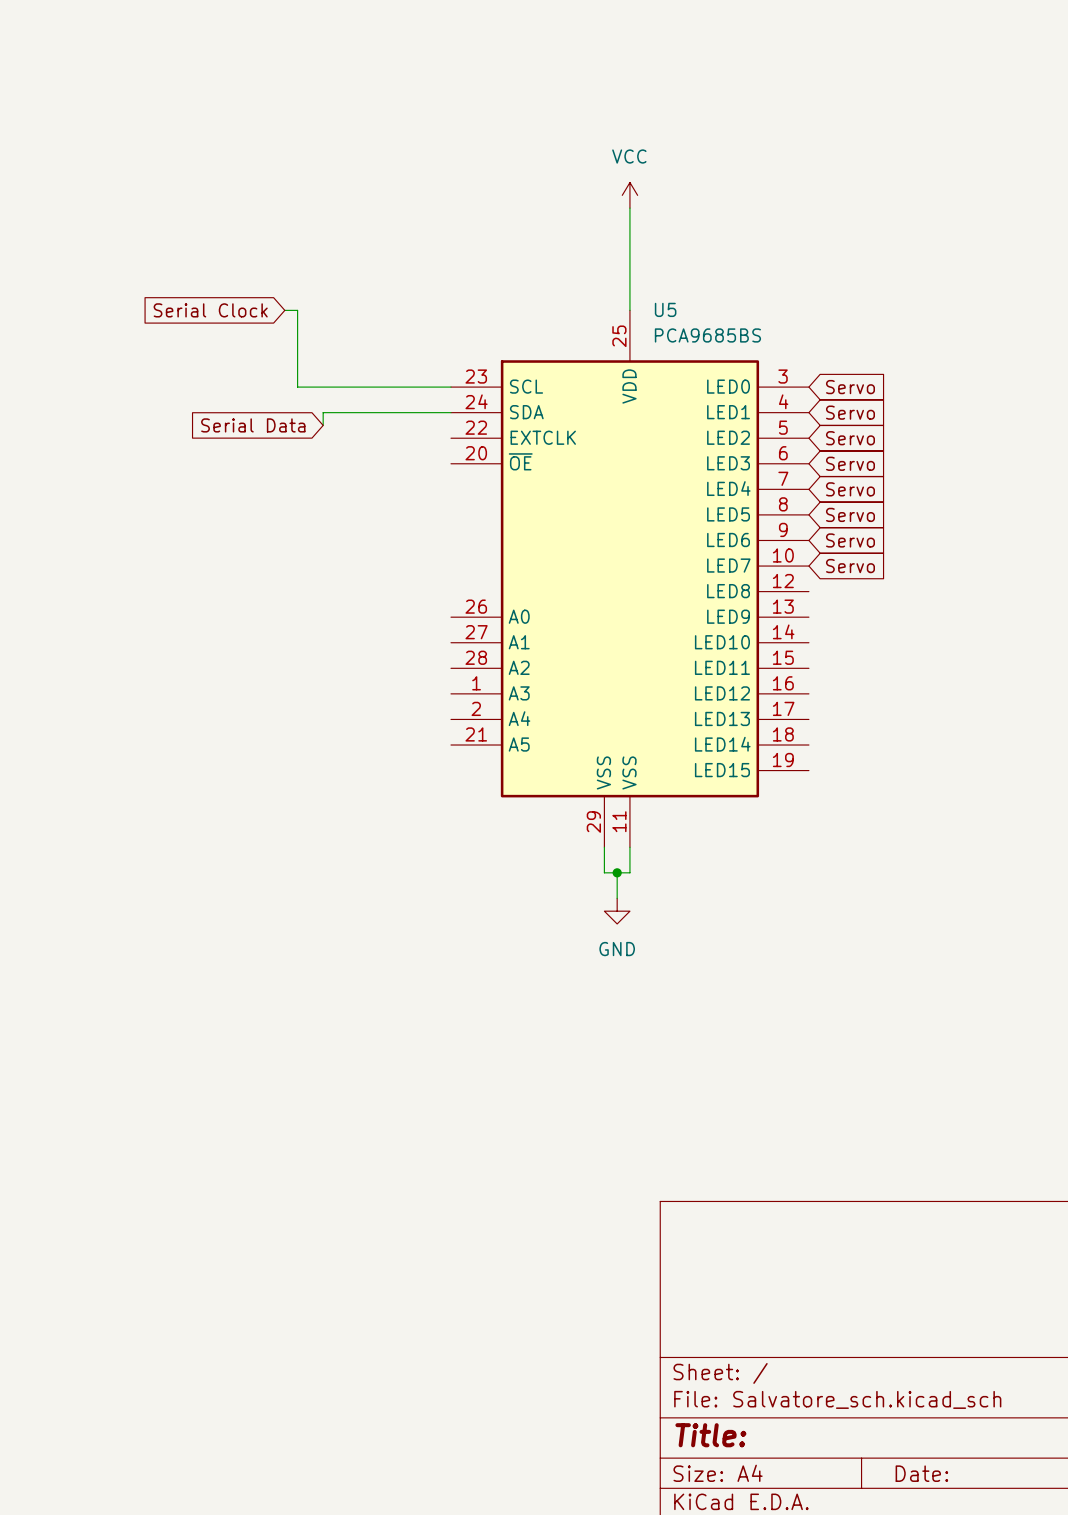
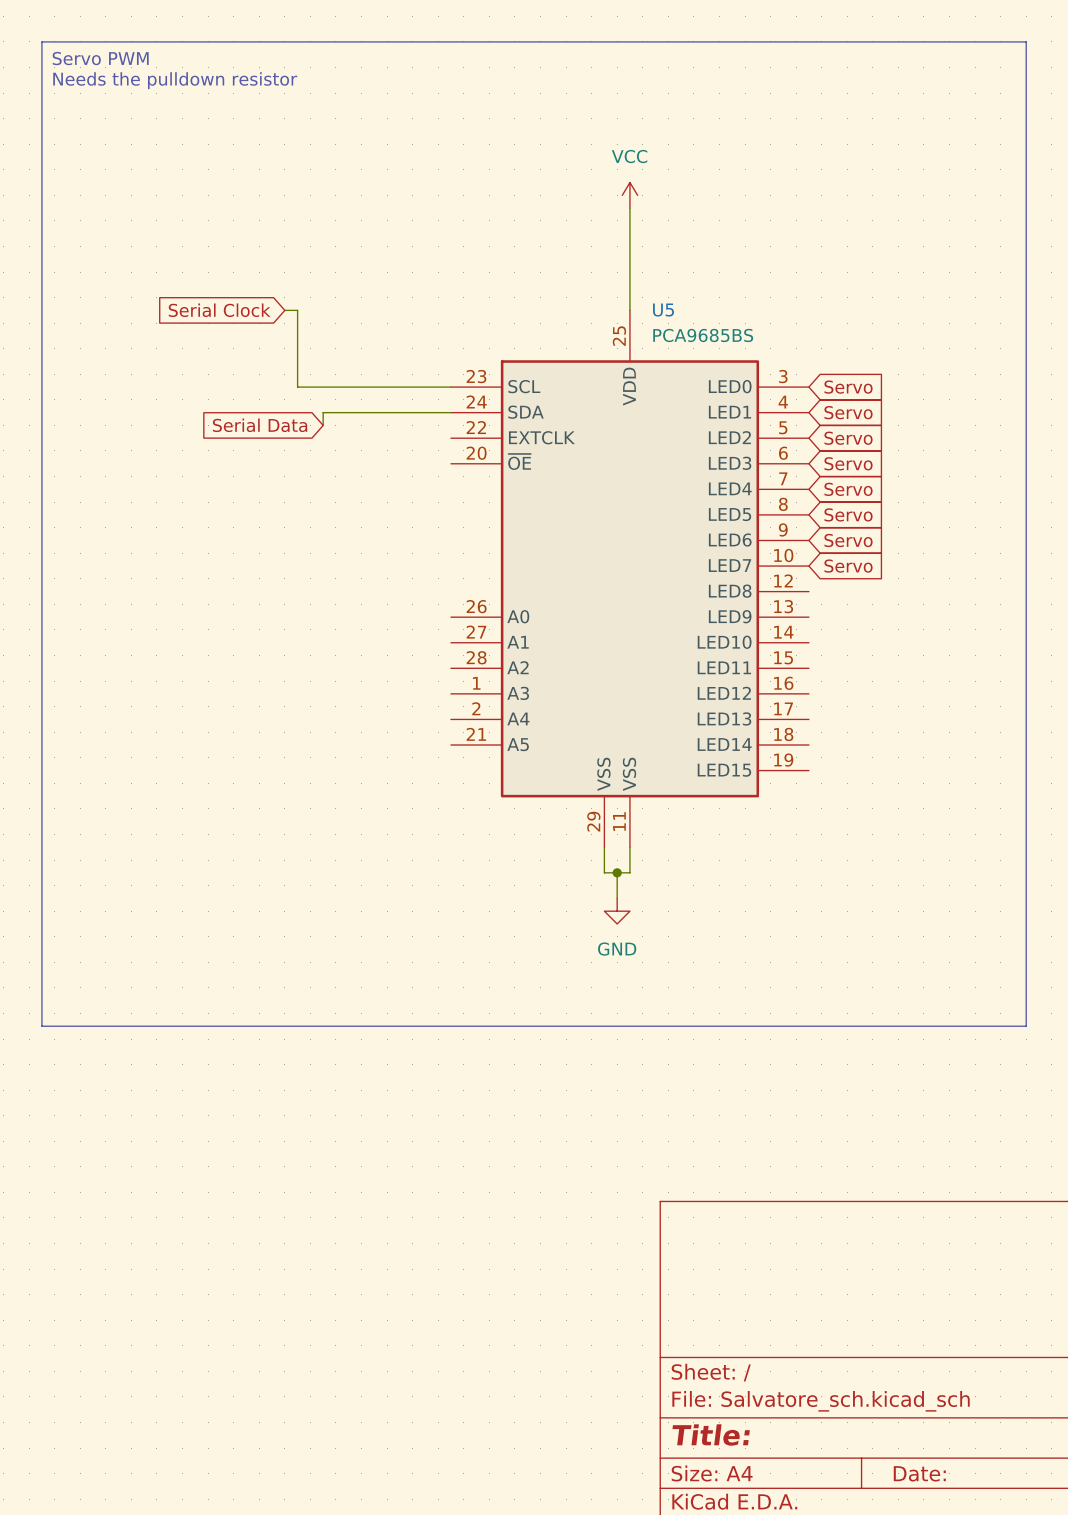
line: none -> (41, 41) (1026, 41) (1026, 1026) (41, 1026) (41, 41)
text: none -> Servo PWM (100, 58)
text: none -> Needs the pulldown resistor (175, 80)

